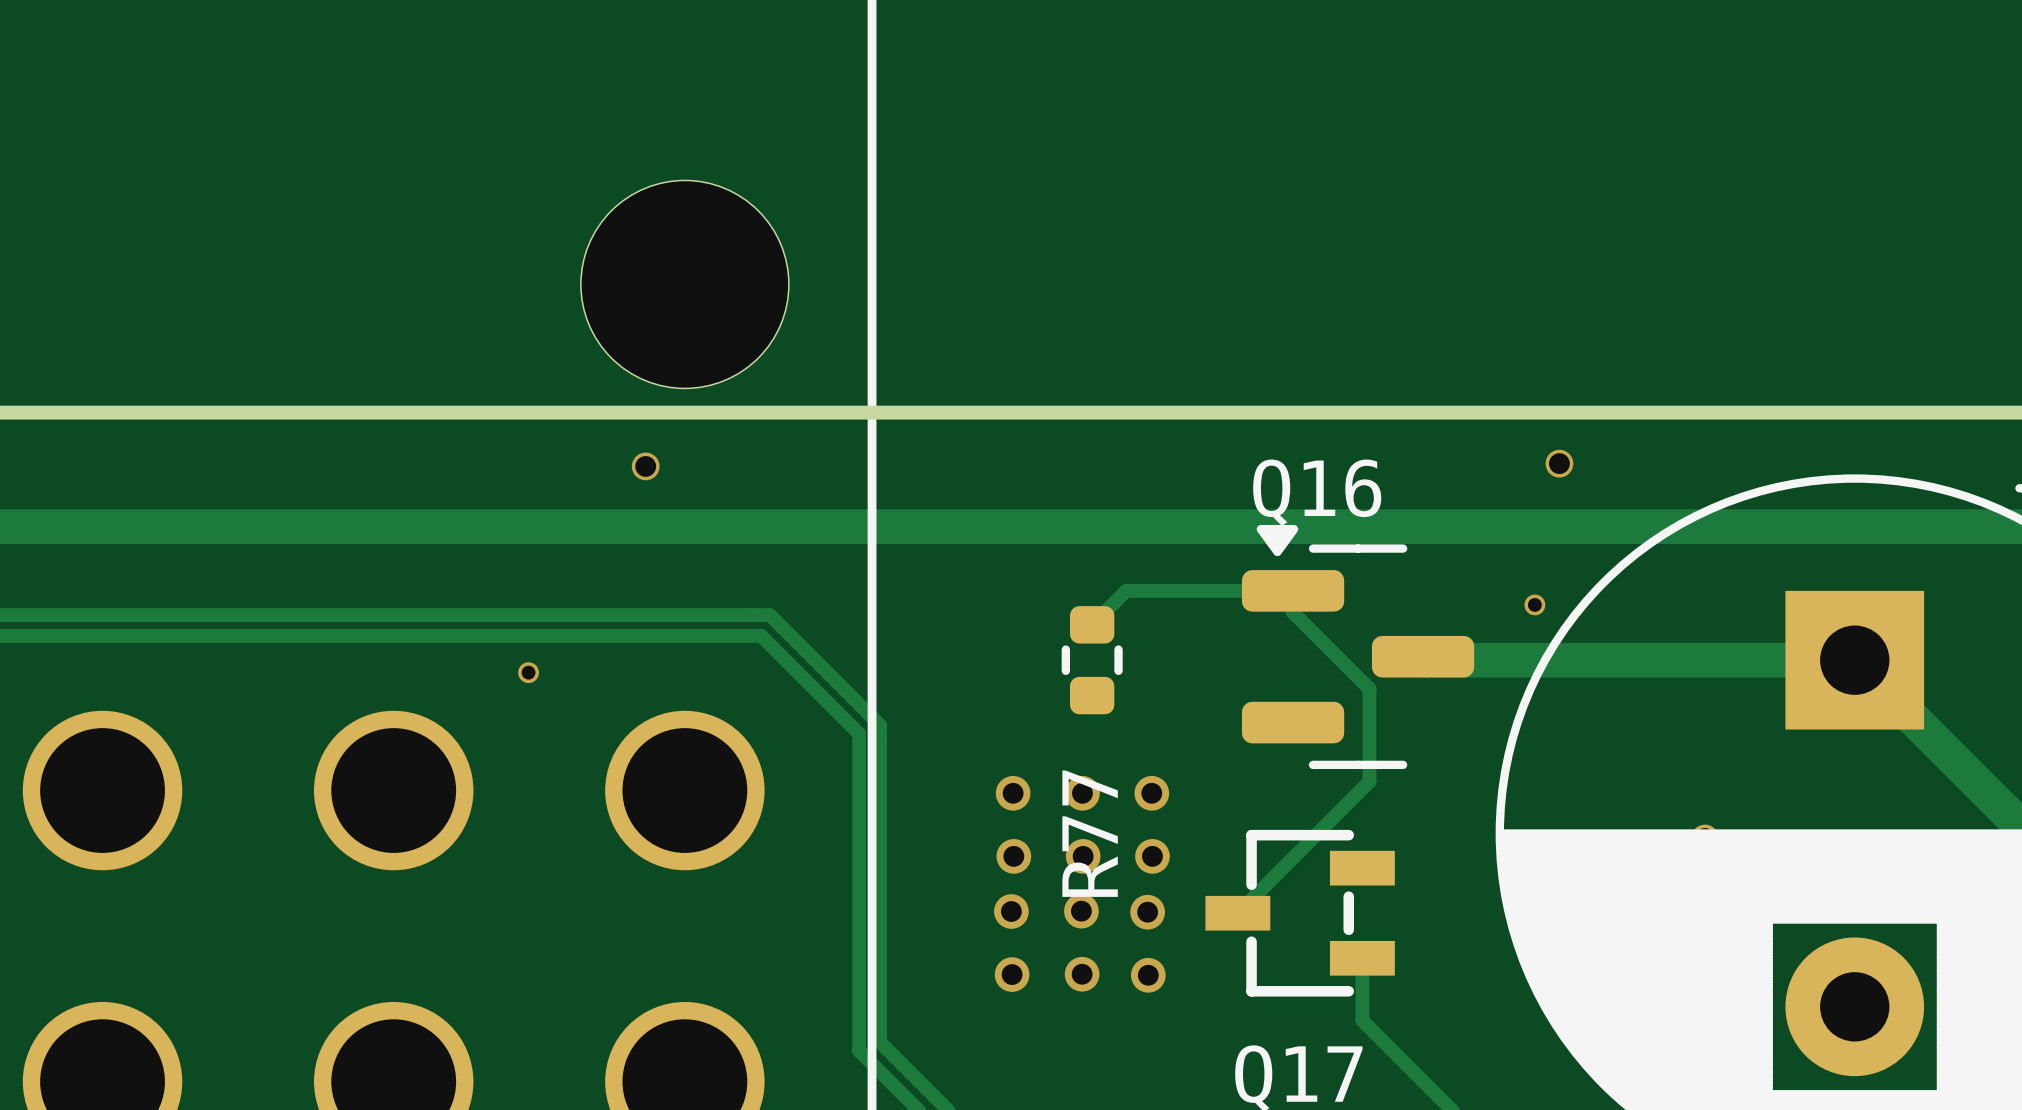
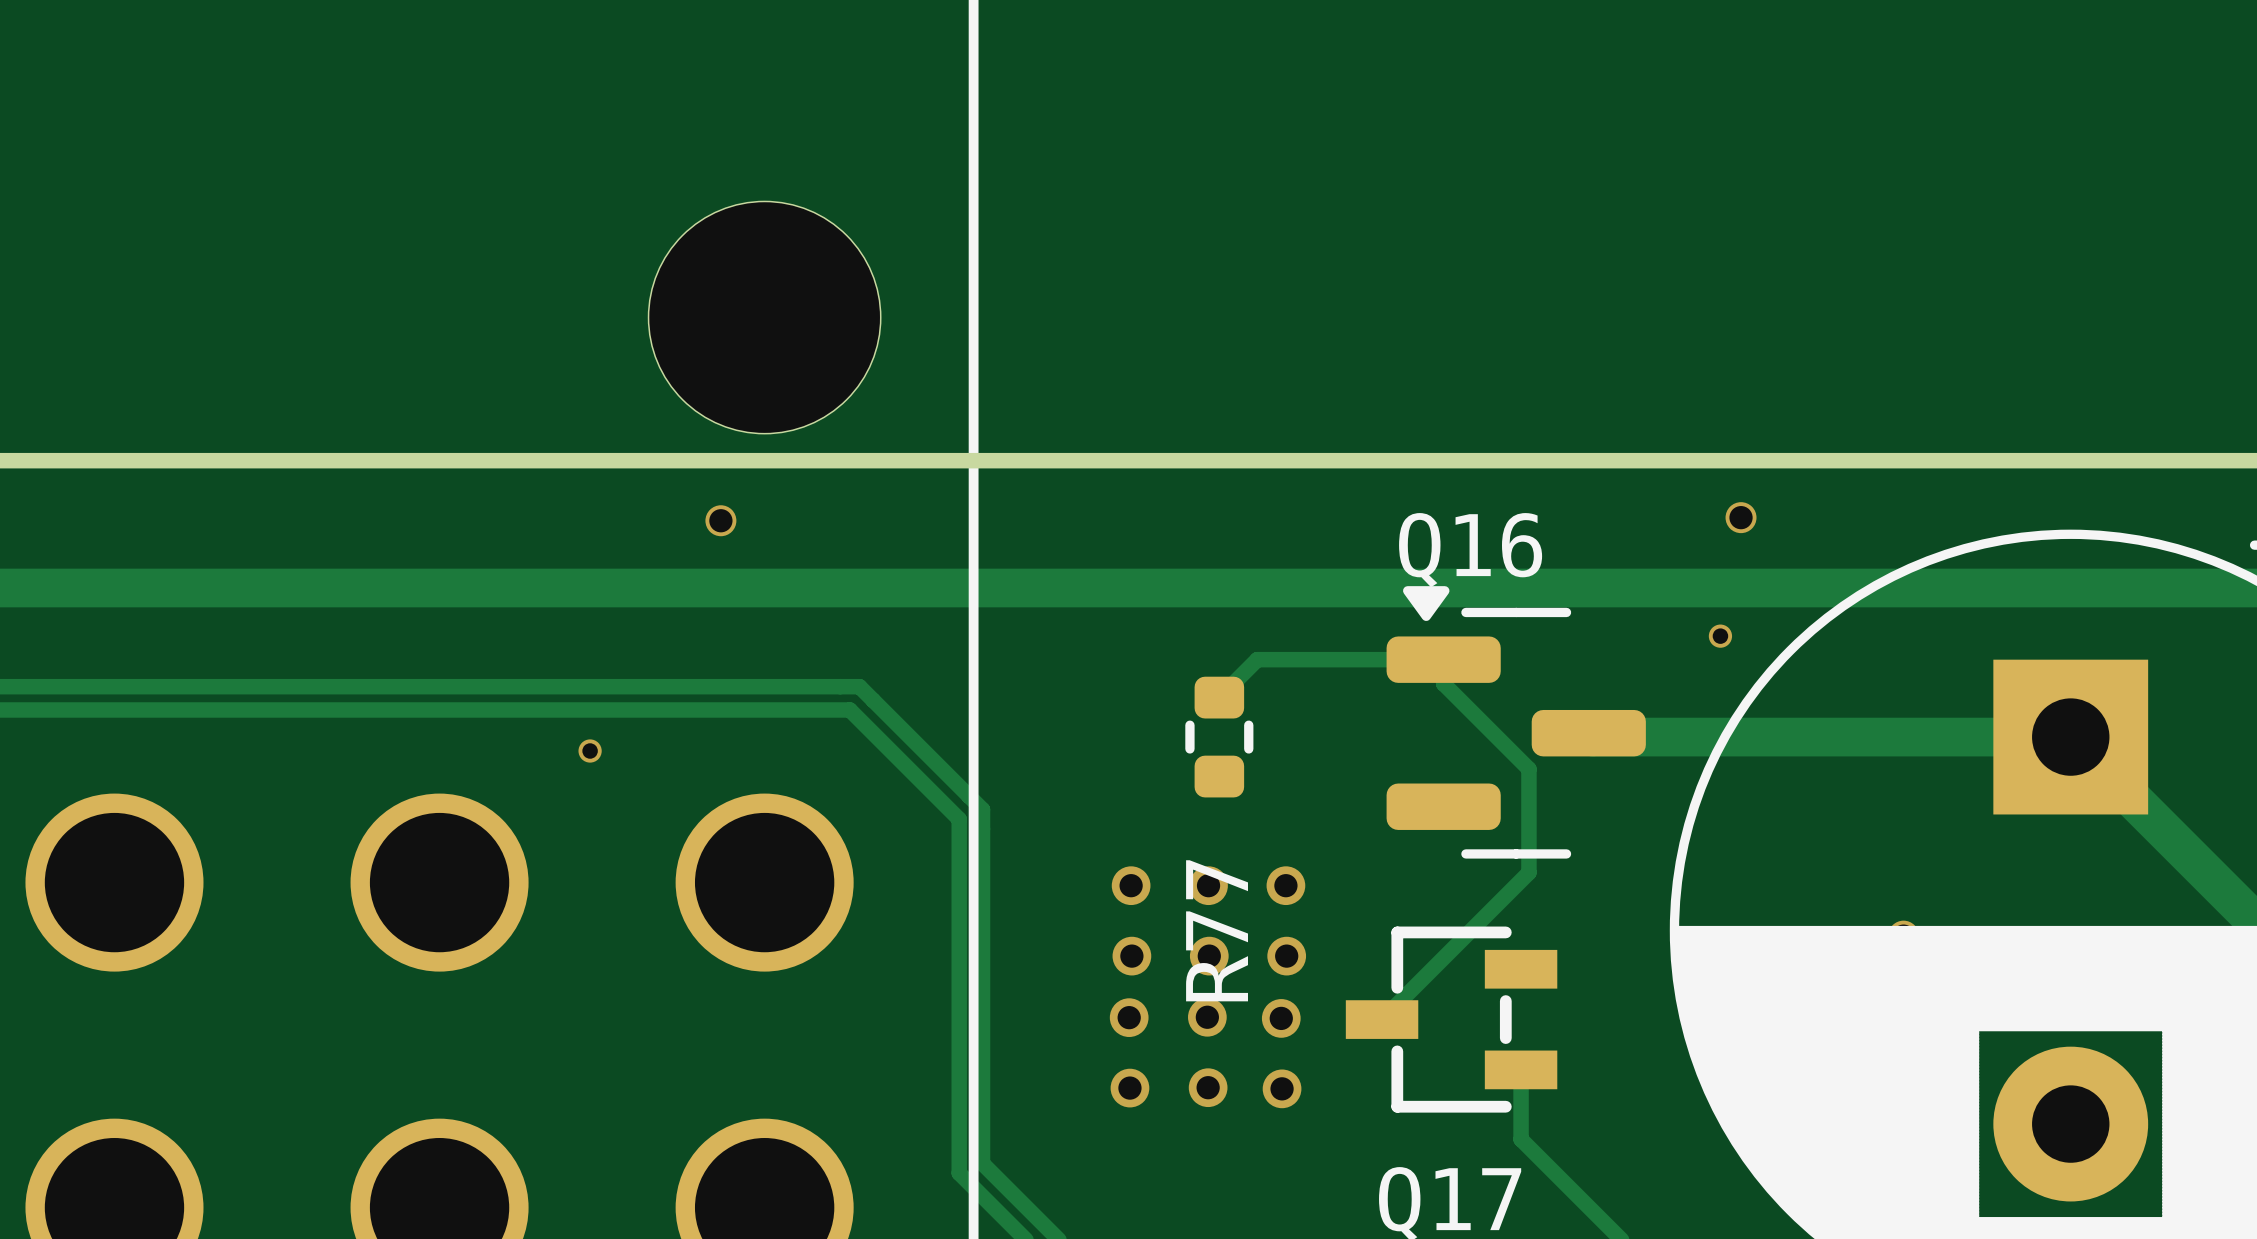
via position: (1534, 604) -> (1720, 636)

